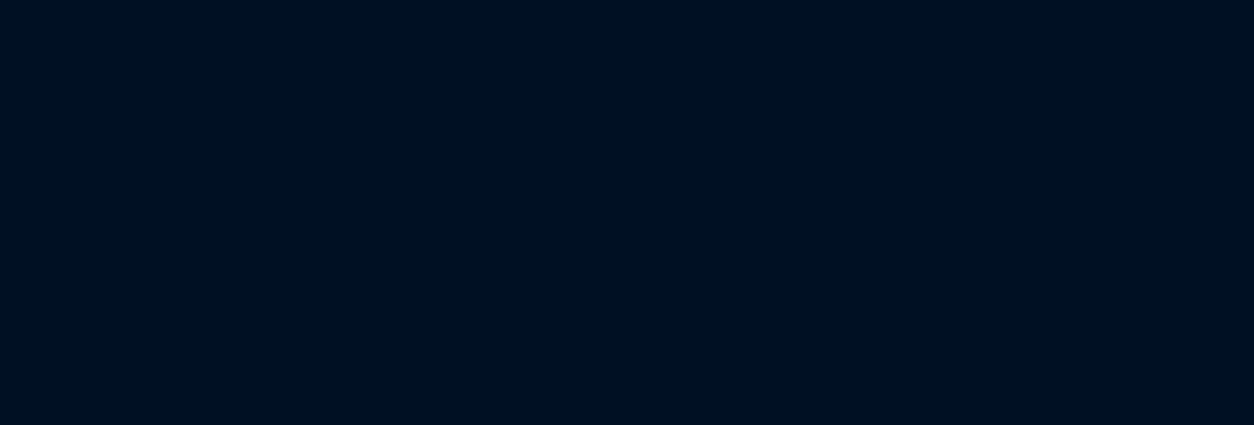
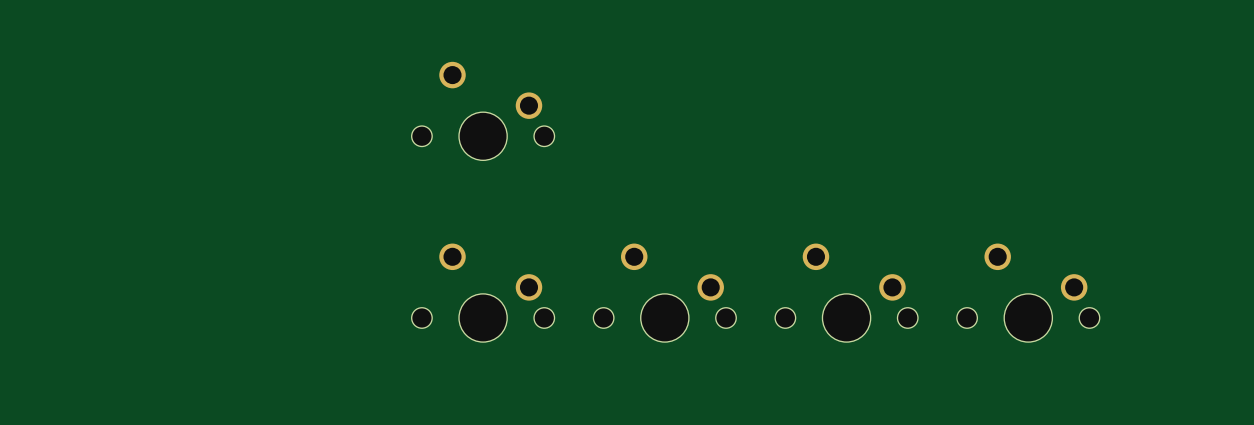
part: none -> (483, 111)
part: none -> (483, 292)
part: none -> (664, 292)
part: none -> (846, 292)
part: none -> (1028, 292)

